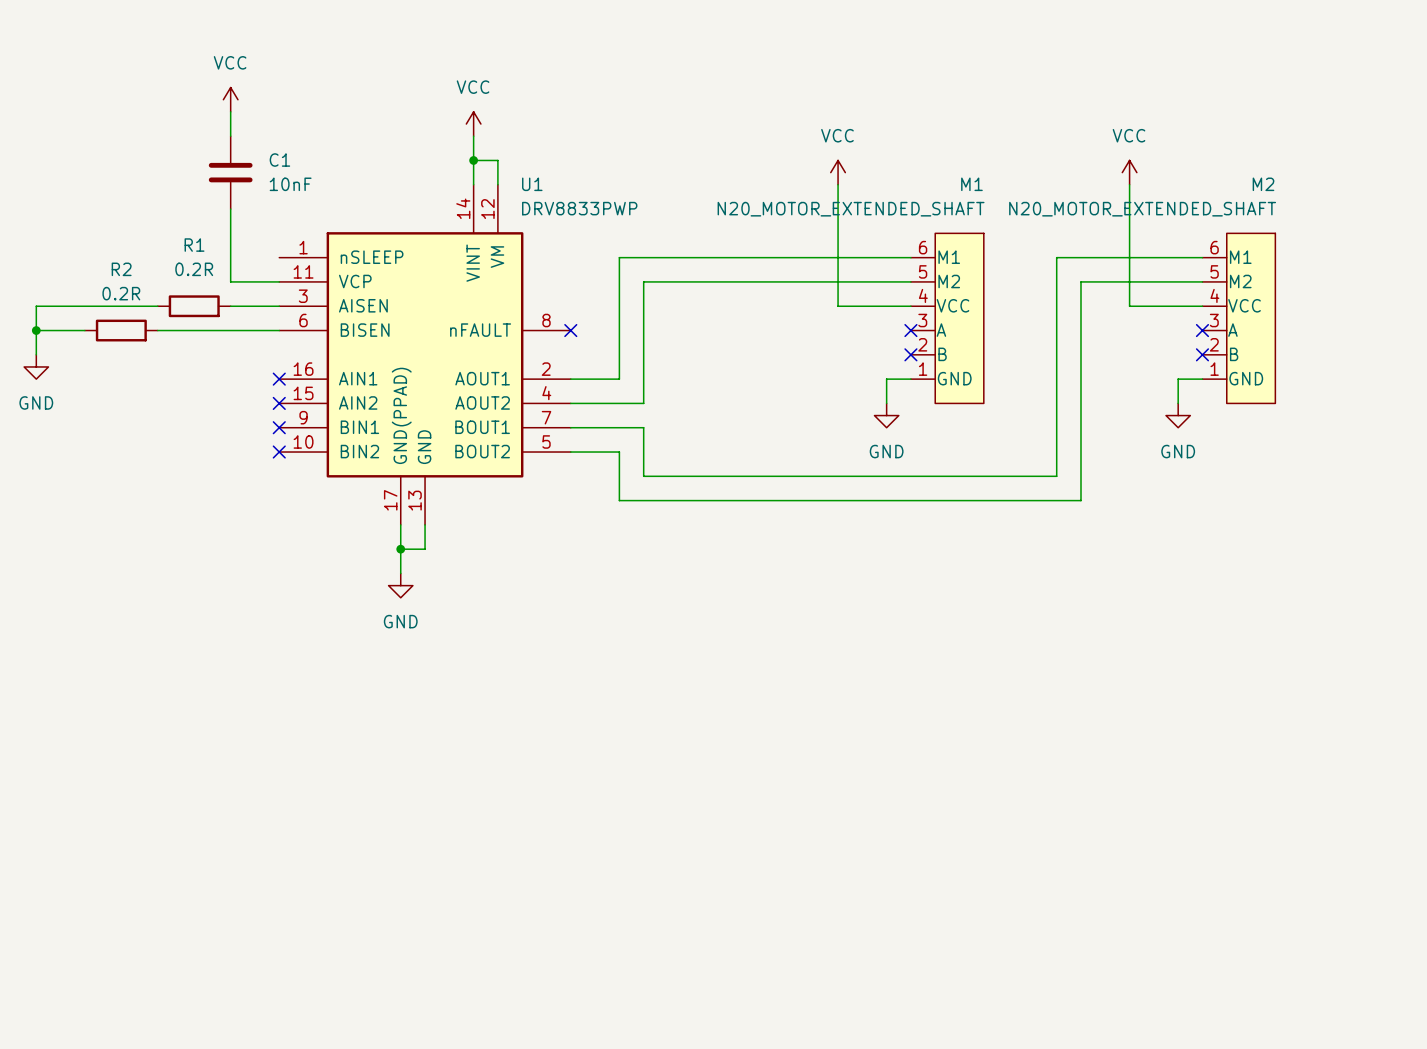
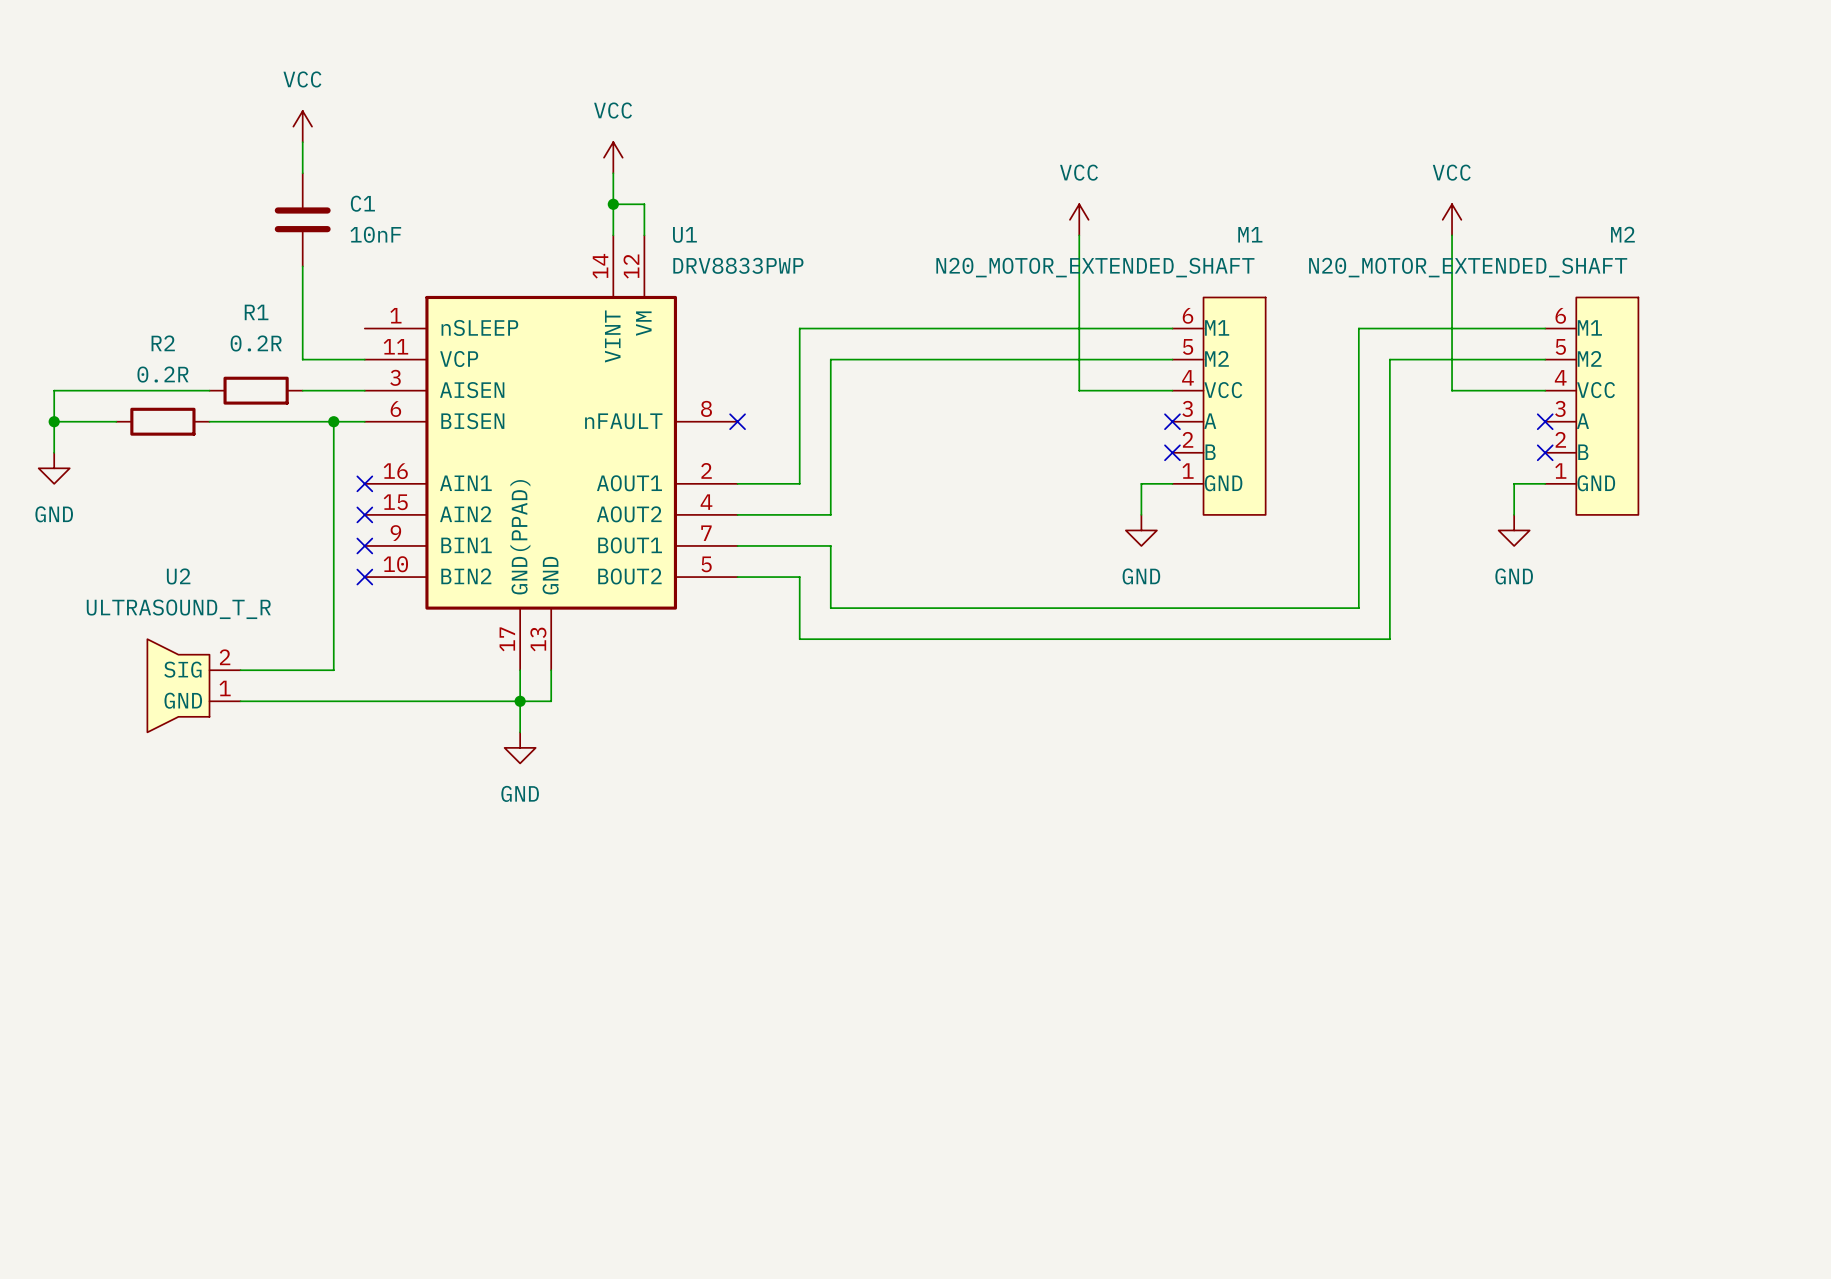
wire: none -> (333, 421) (333, 670) (240, 670)
junction: none -> (333, 421)
U2: none -> ULTRASOUND_T_R (193, 685)
wire: none -> (240, 701) (520, 701)

